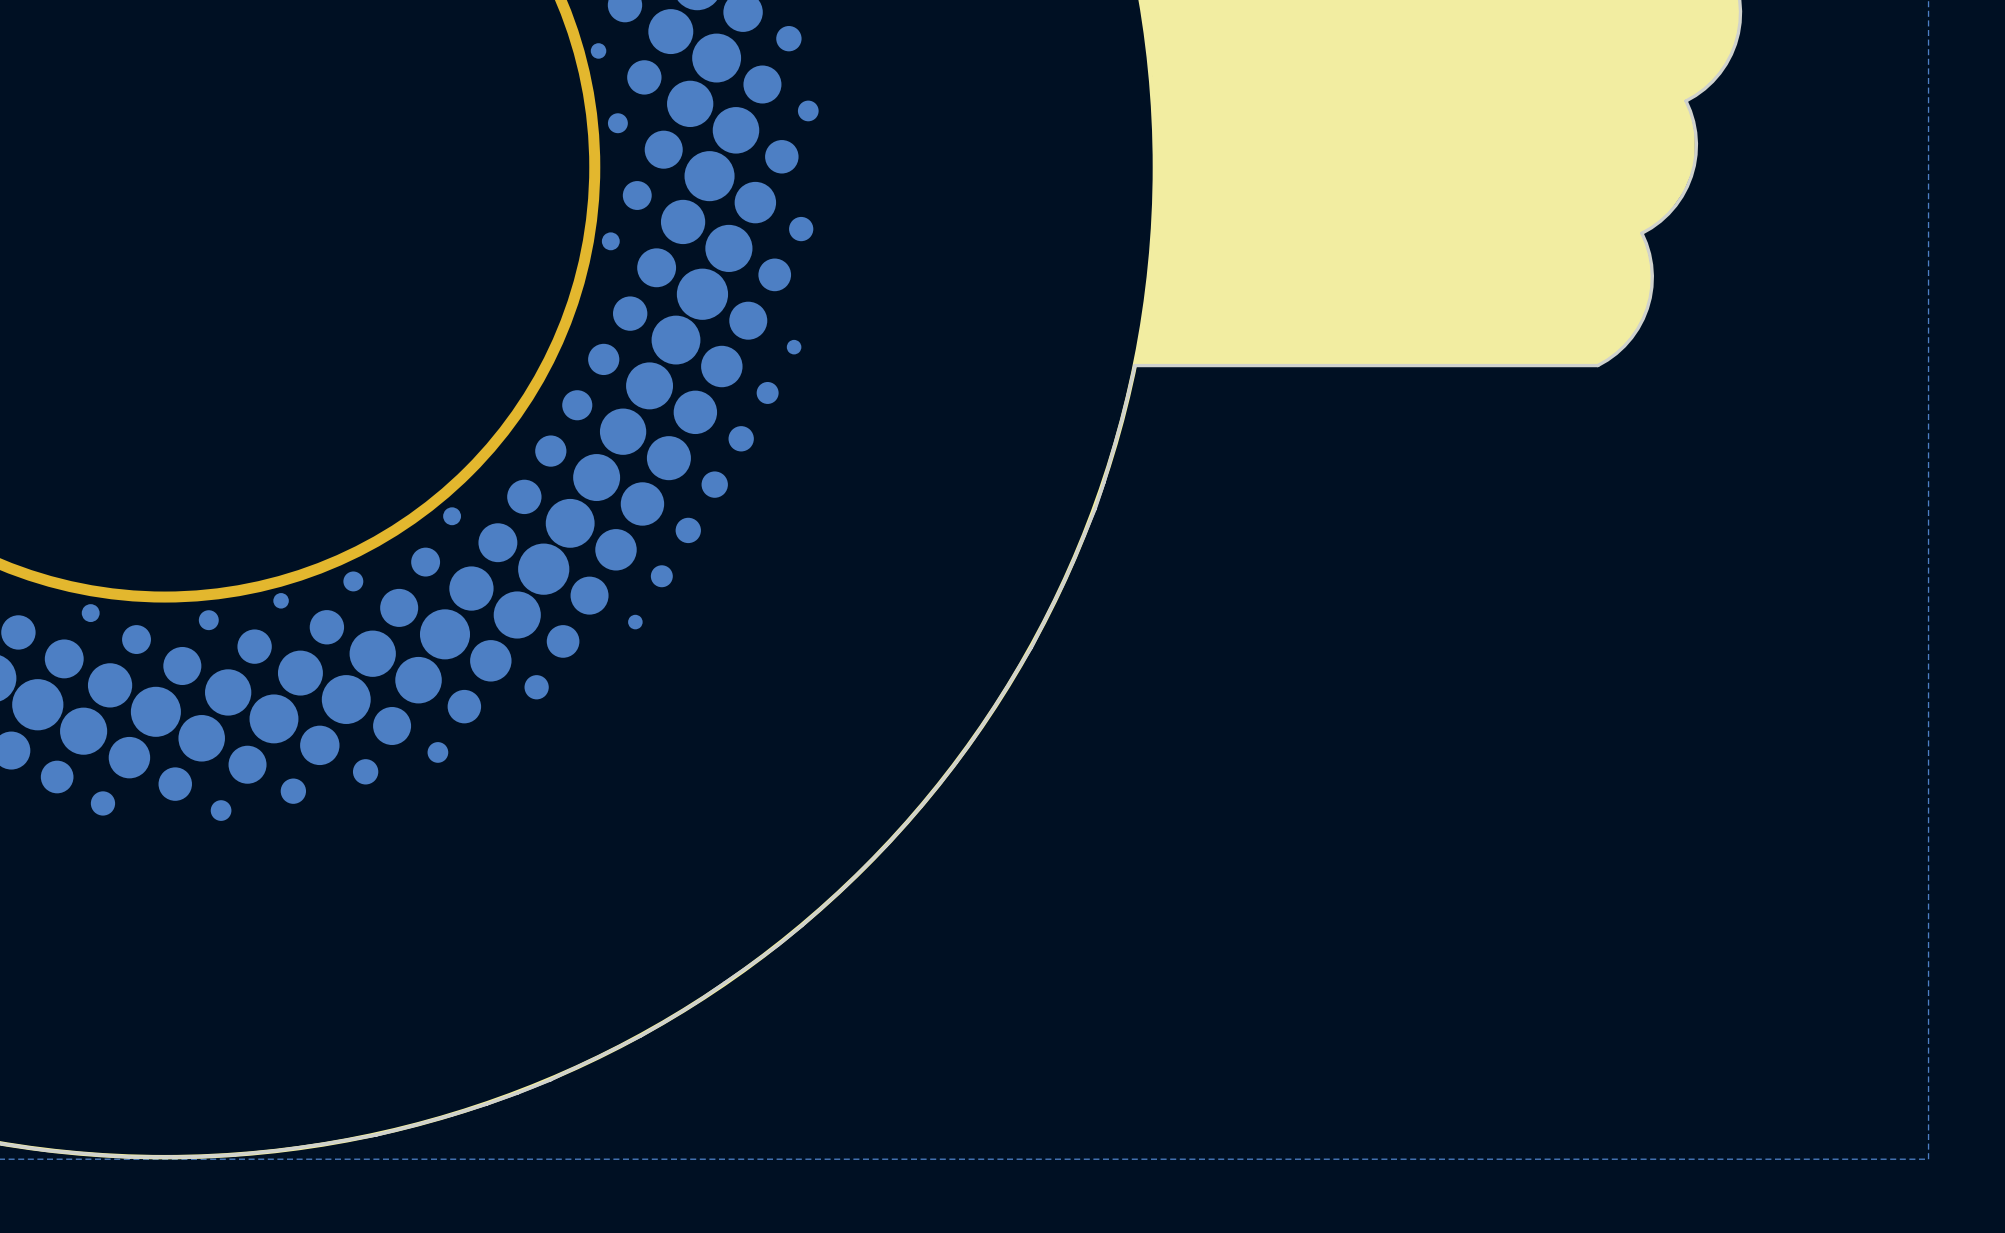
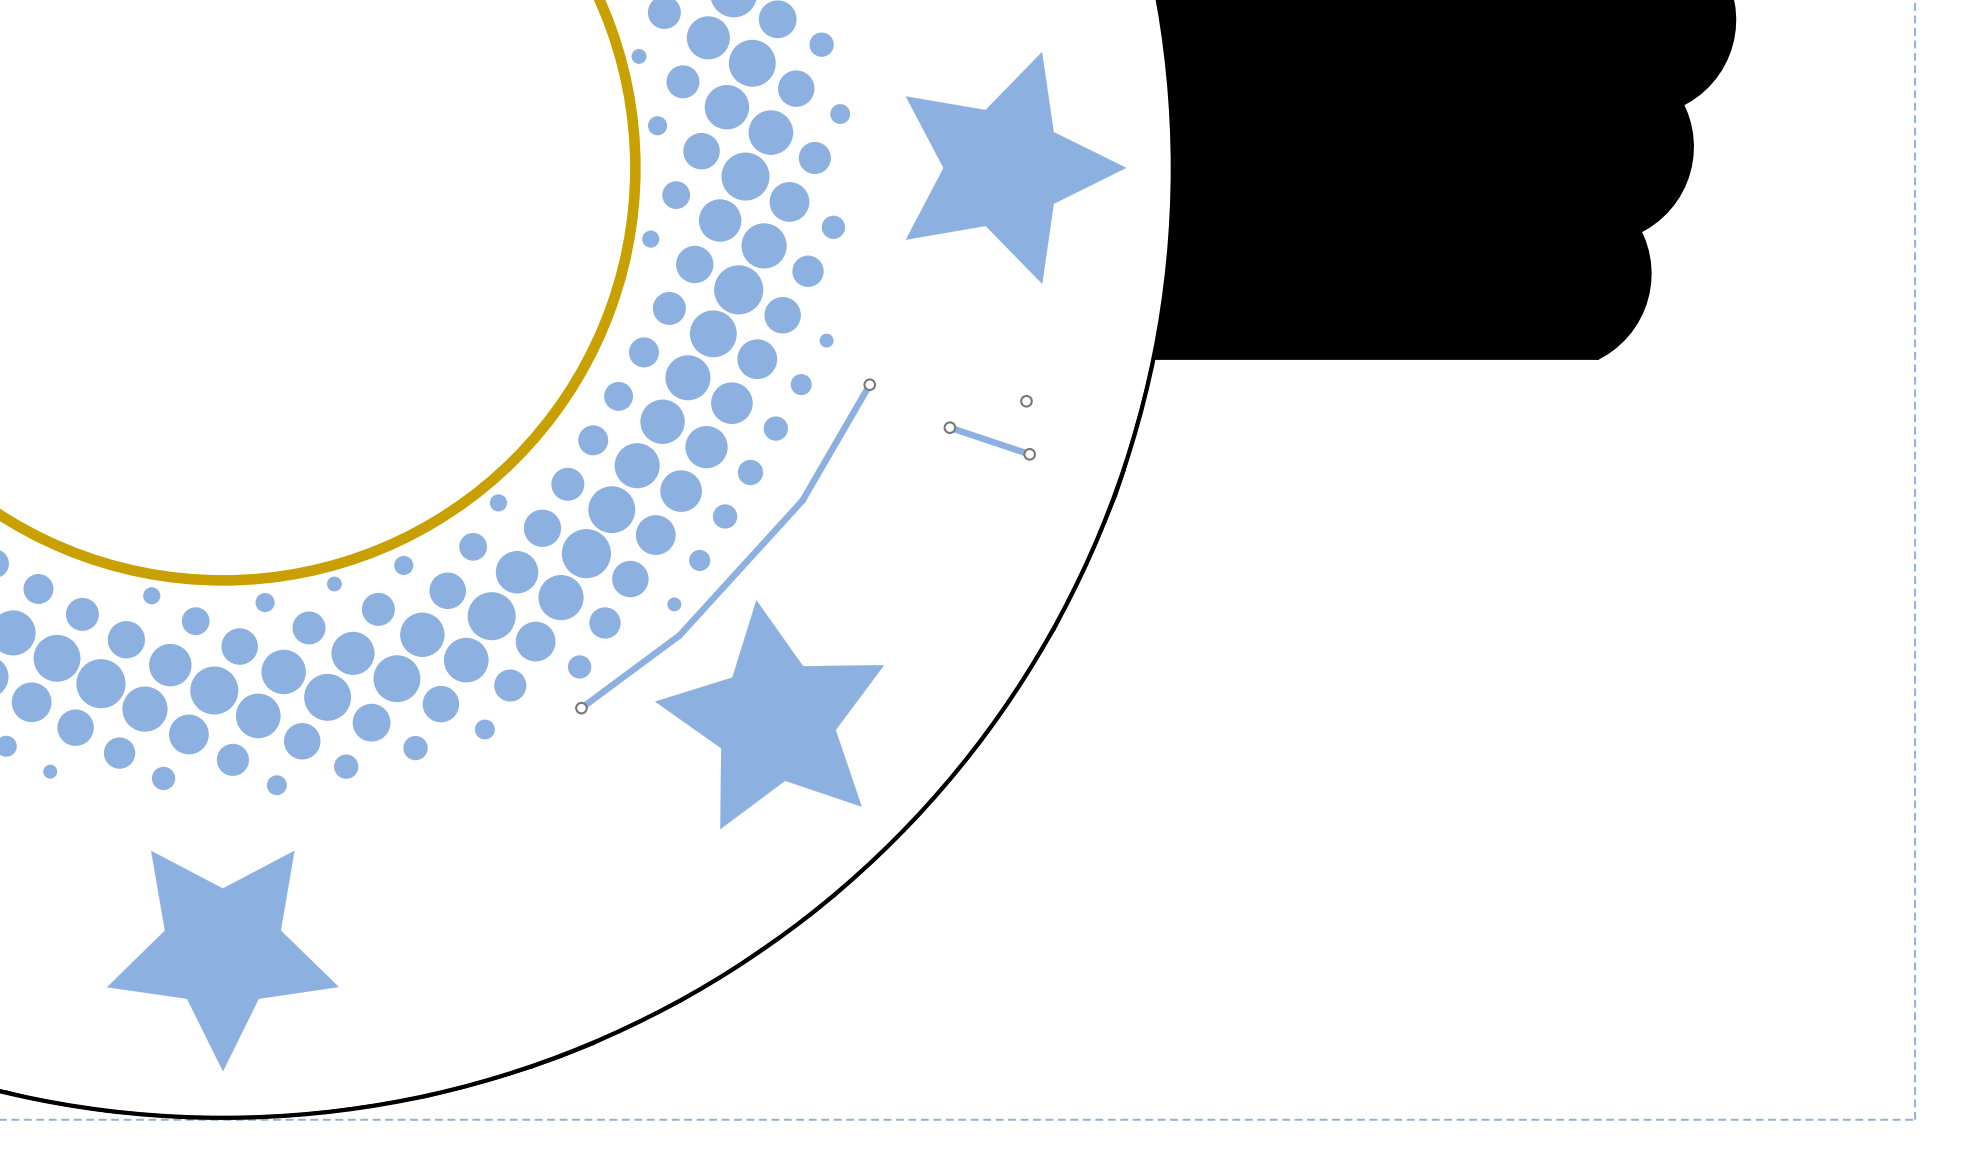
drawing: none -> [905, 52, 1127, 284]
track: none -> (869, 384) (802, 500) (679, 635) (581, 708)
via: none -> (869, 384)
via: none -> (1026, 401)
track: none -> (949, 427) (1029, 454)
via: none -> (949, 427)
via: none -> (1029, 454)
drawing: none -> [655, 600, 885, 830]
via: none -> (581, 708)
drawing: none -> [106, 850, 339, 1072]

